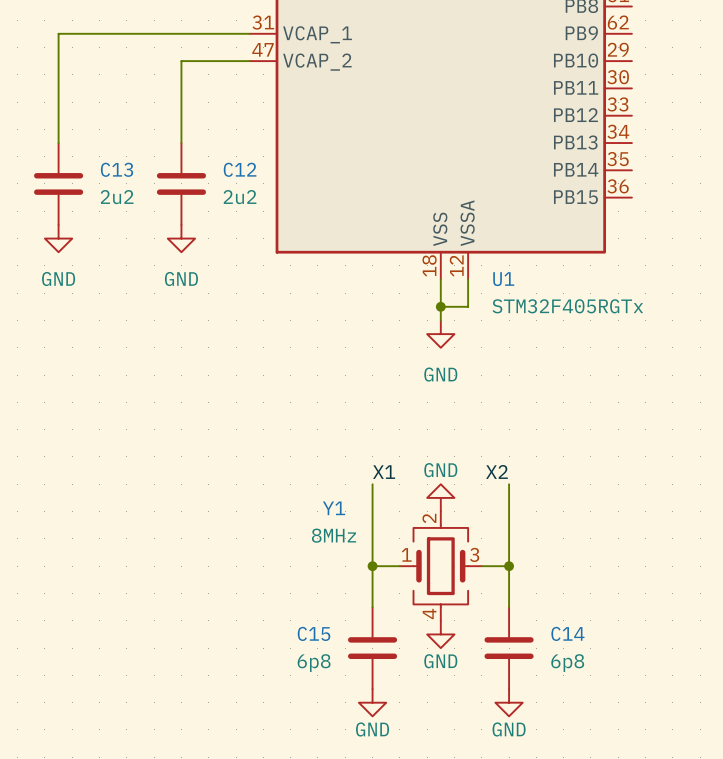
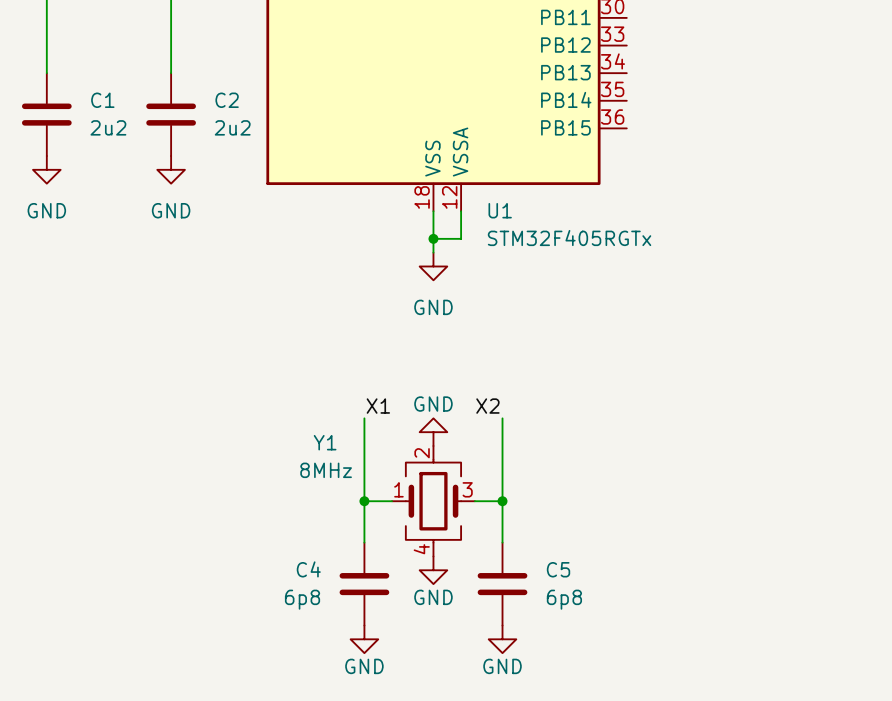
C13 name: C13 (117, 169) -> C1 (102, 100)
C12 name: C12 (240, 169) -> C2 (227, 100)
C15 name: C15 (314, 633) -> C4 (308, 569)
C14 name: C14 (567, 633) -> C5 (558, 569)

